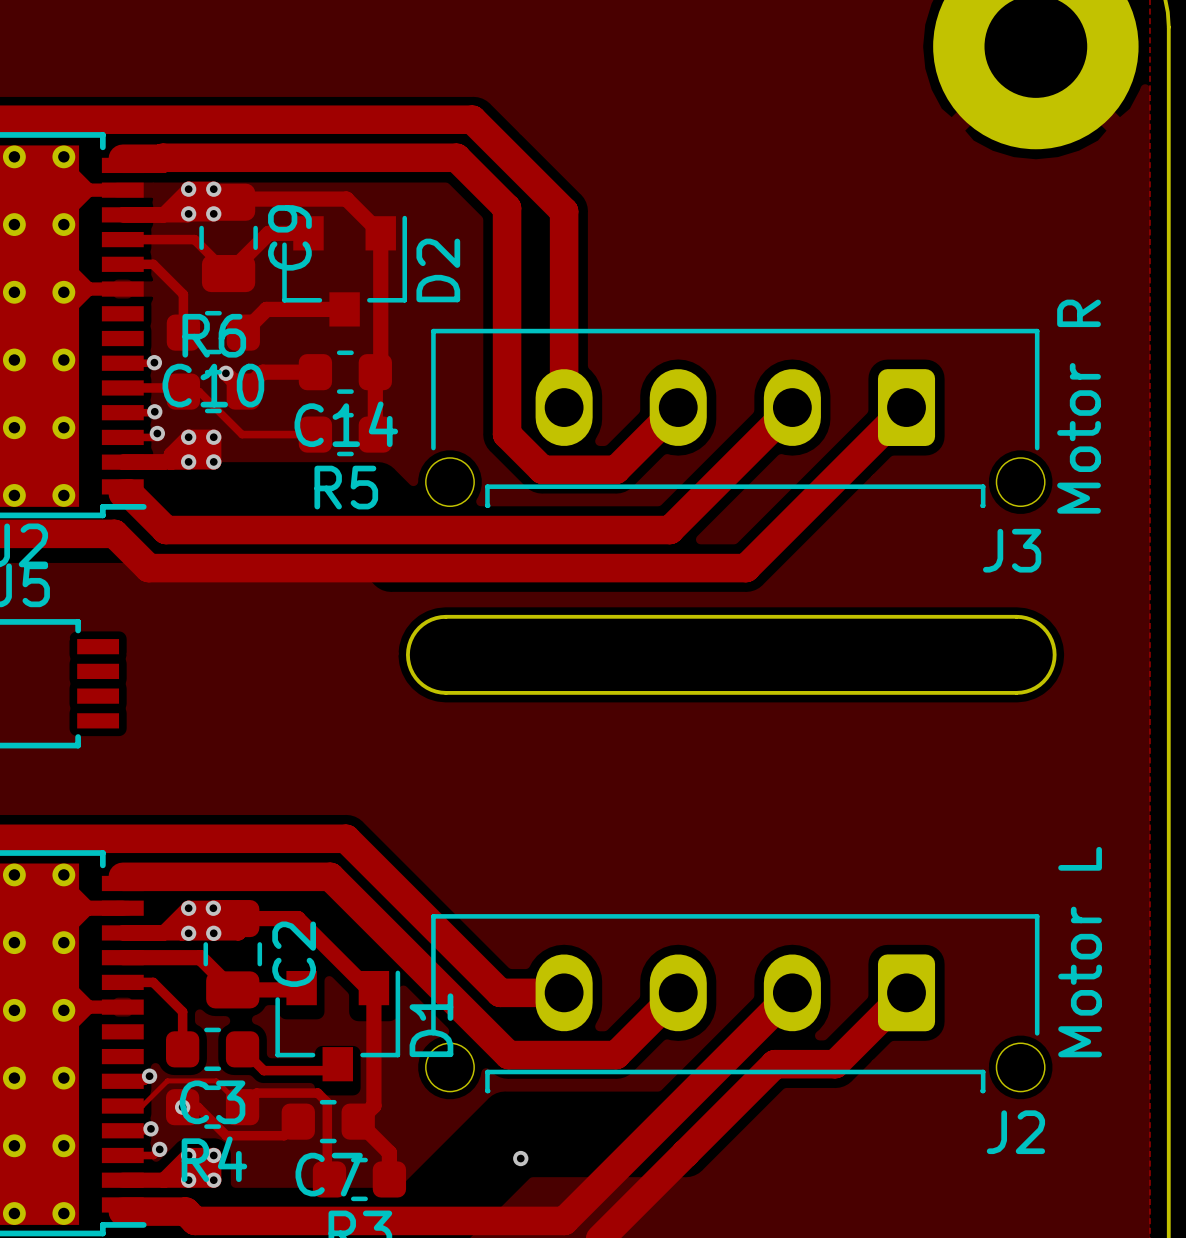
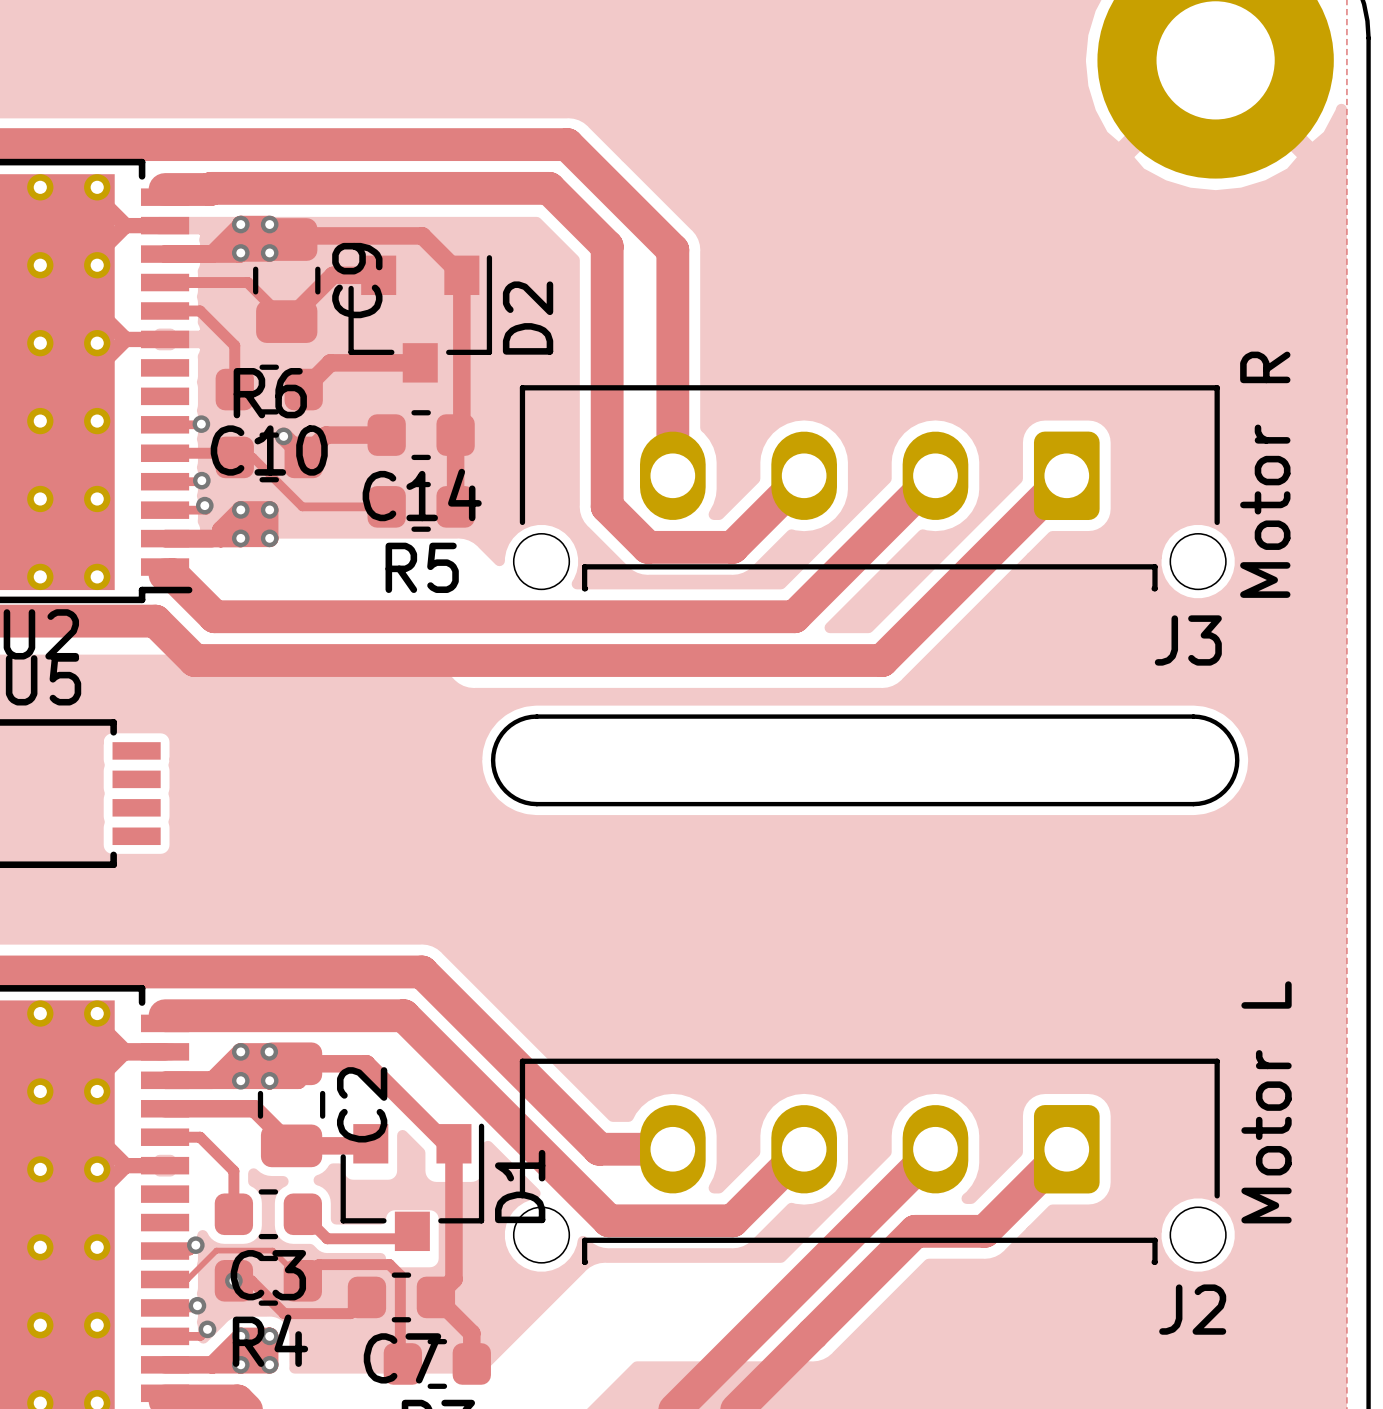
via: (520, 1158) -> none

